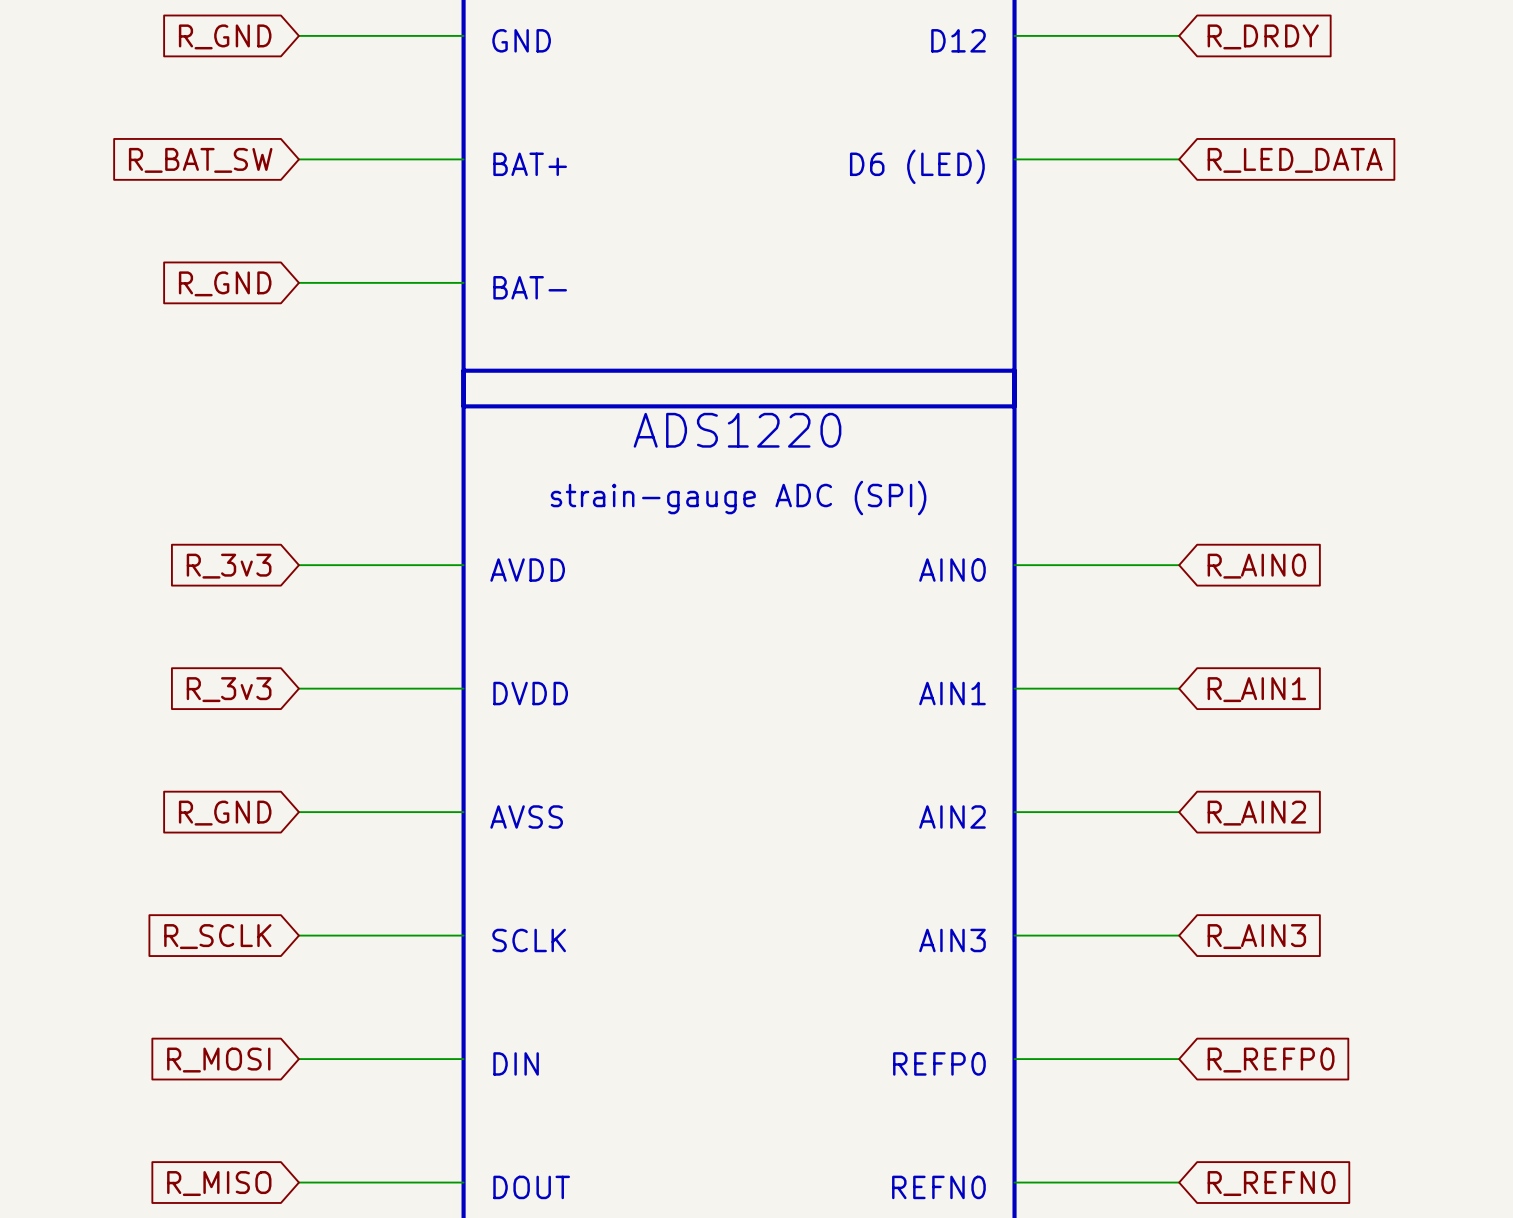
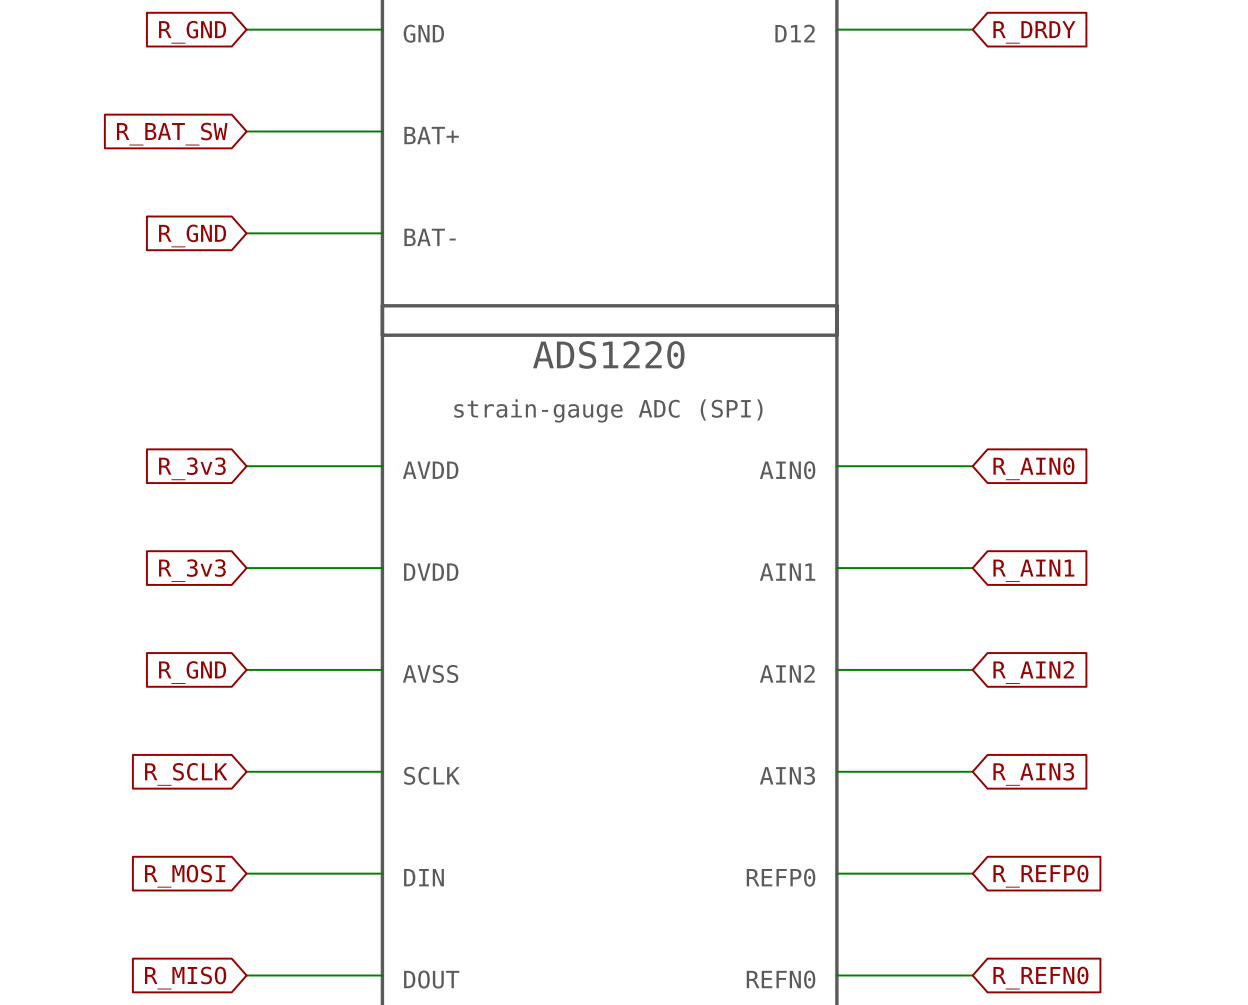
wire: (1014, 159) (1179, 159) -> none
global label: R_LED_DATA (1295, 160) -> none
text: D6 (LED) (917, 166) -> none

